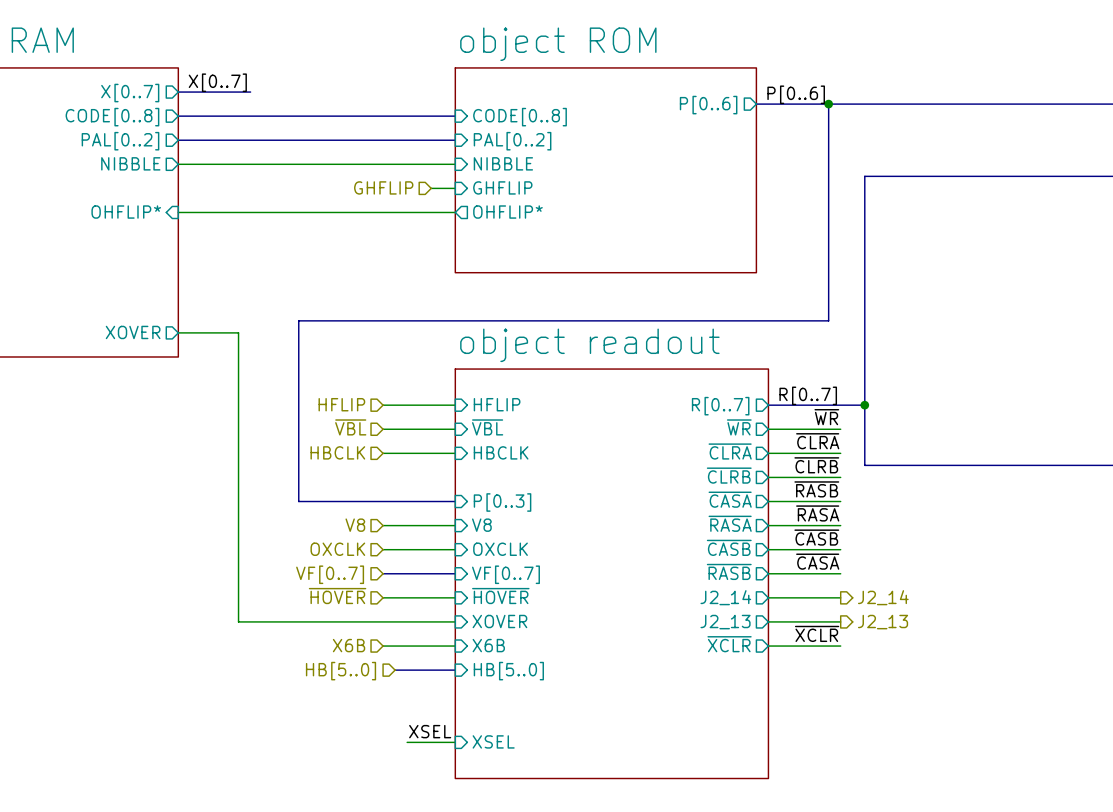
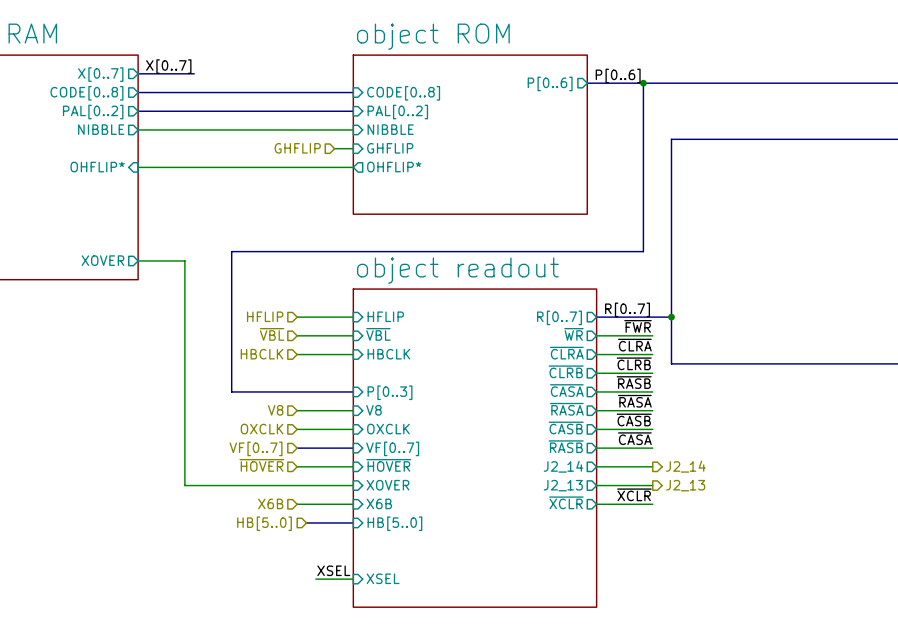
label: ~{WR} (826, 417) -> ~{FWR} (637, 326)

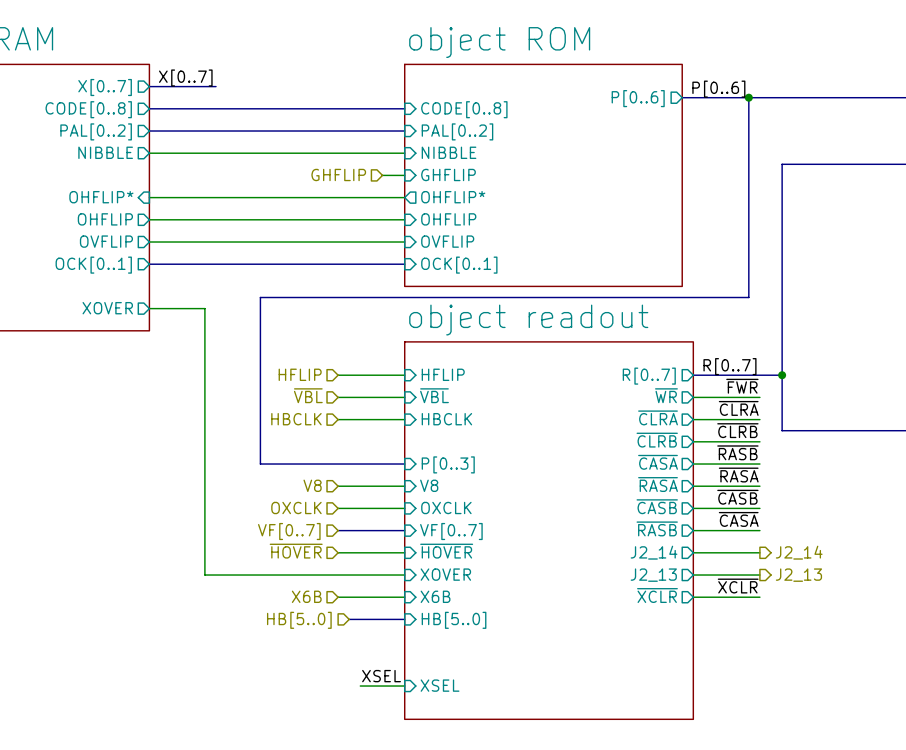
sheet object ROM: (470, 134) -> none
sheet object ROM: none -> (543, 175)
sheet pin: none -> OHFLIP (105, 219)
sheet pin: none -> OHFLIP (448, 219)
wire: none -> (149, 219) (404, 219)
sheet pin: none -> OVFLIP (106, 241)
wire: none -> (149, 242) (404, 242)
sheet pin: none -> OVFLIP (447, 241)
bus: none -> (149, 264) (404, 264)
sheet pin: none -> OCK[0..1] (93, 265)
sheet pin: none -> OCK[0..1] (459, 265)

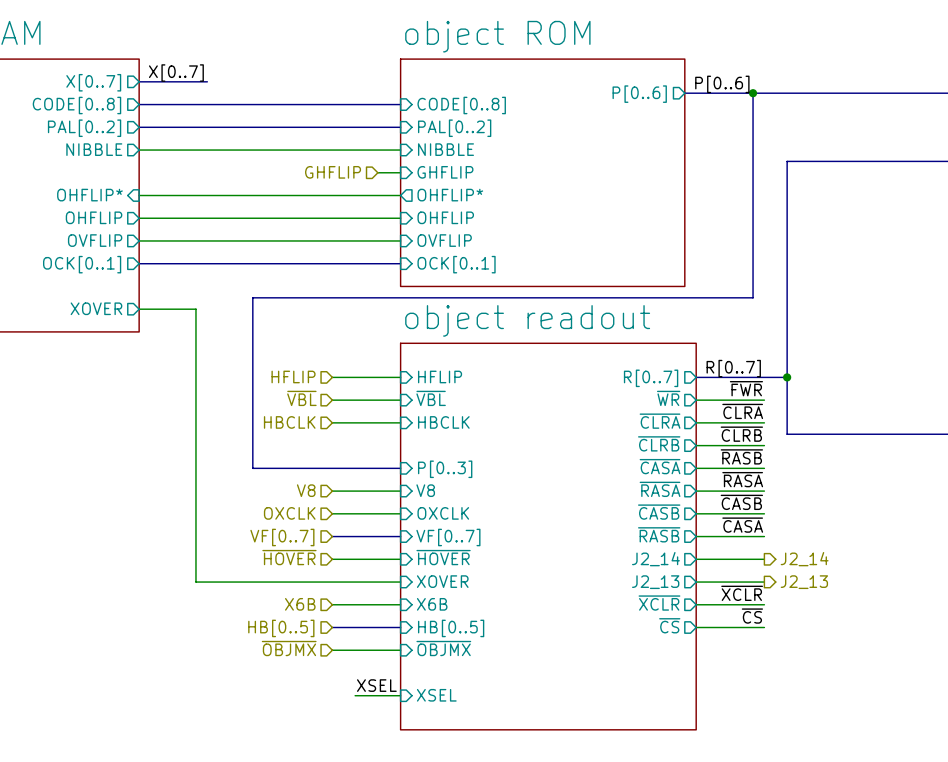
label: none -> ~{CS} (752, 616)
sheet pin: none -> ~{CS} (669, 625)
bus: none -> (332, 627) (343, 627)
wire: none -> (696, 627) (764, 627)
hierarchical label: HB[5..0] (299, 620) -> HB[0..5] (281, 628)
sheet pin: HB[5..0] (454, 620) -> HB[0..5] (451, 628)
hierarchical label: none -> ~{OBJMX} (289, 648)
sheet pin: none -> ~{OBJMX} (443, 648)
wire: none -> (332, 650) (400, 650)

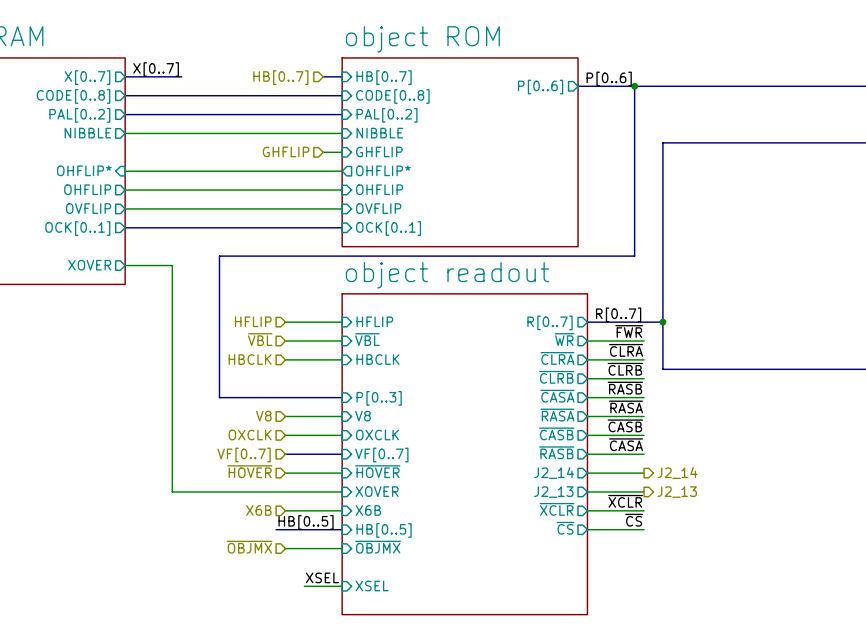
bus: none -> (323, 76) (342, 76)
hierarchical label: none -> HB[0..7] (280, 77)
sheet pin: none -> HB[0..7] (384, 77)
label: none -> HB[0..5] (306, 522)
bus: none -> (276, 529) (285, 529)
hierarchical label: HB[0..5] (281, 628) -> none

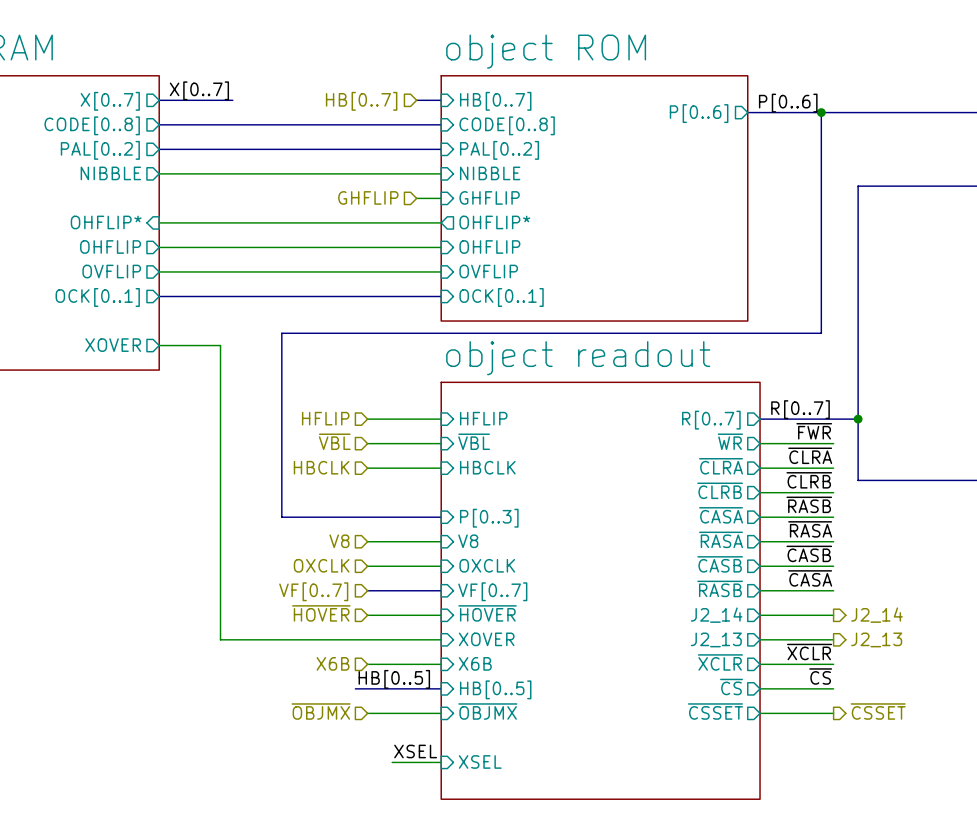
sheet pin: none -> ~{CSSET} (715, 711)
hierarchical label: none -> ~{CSSET} (878, 711)
wire: none -> (760, 713) (833, 713)

